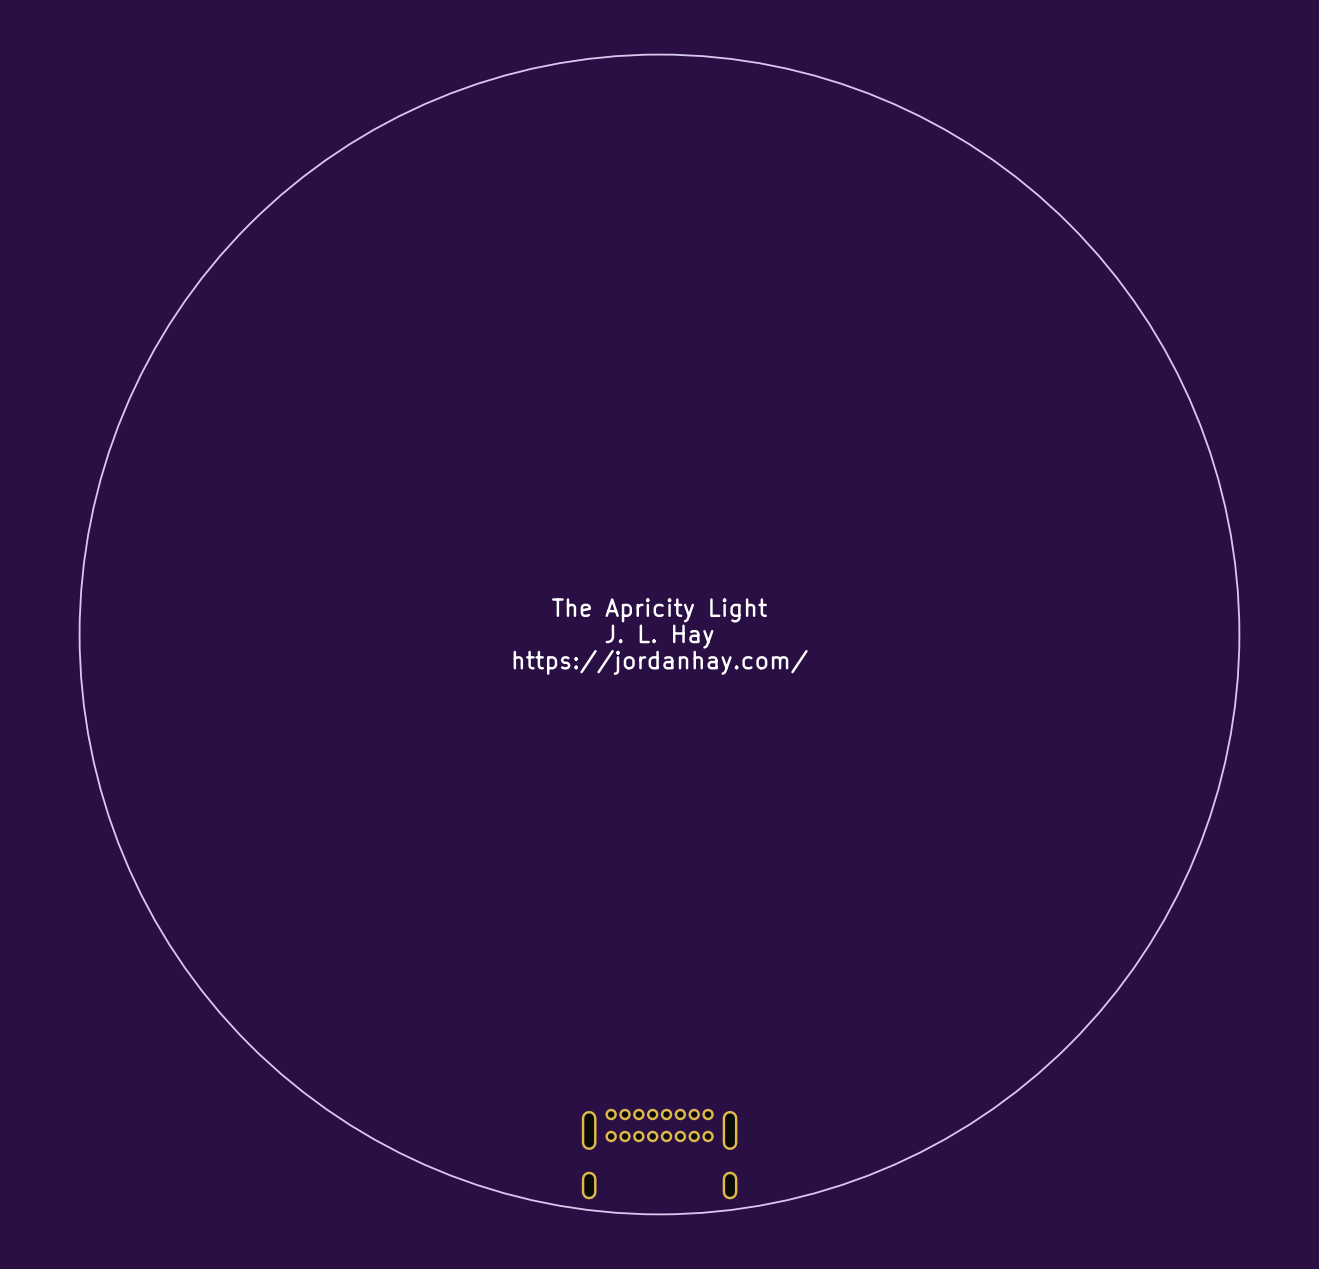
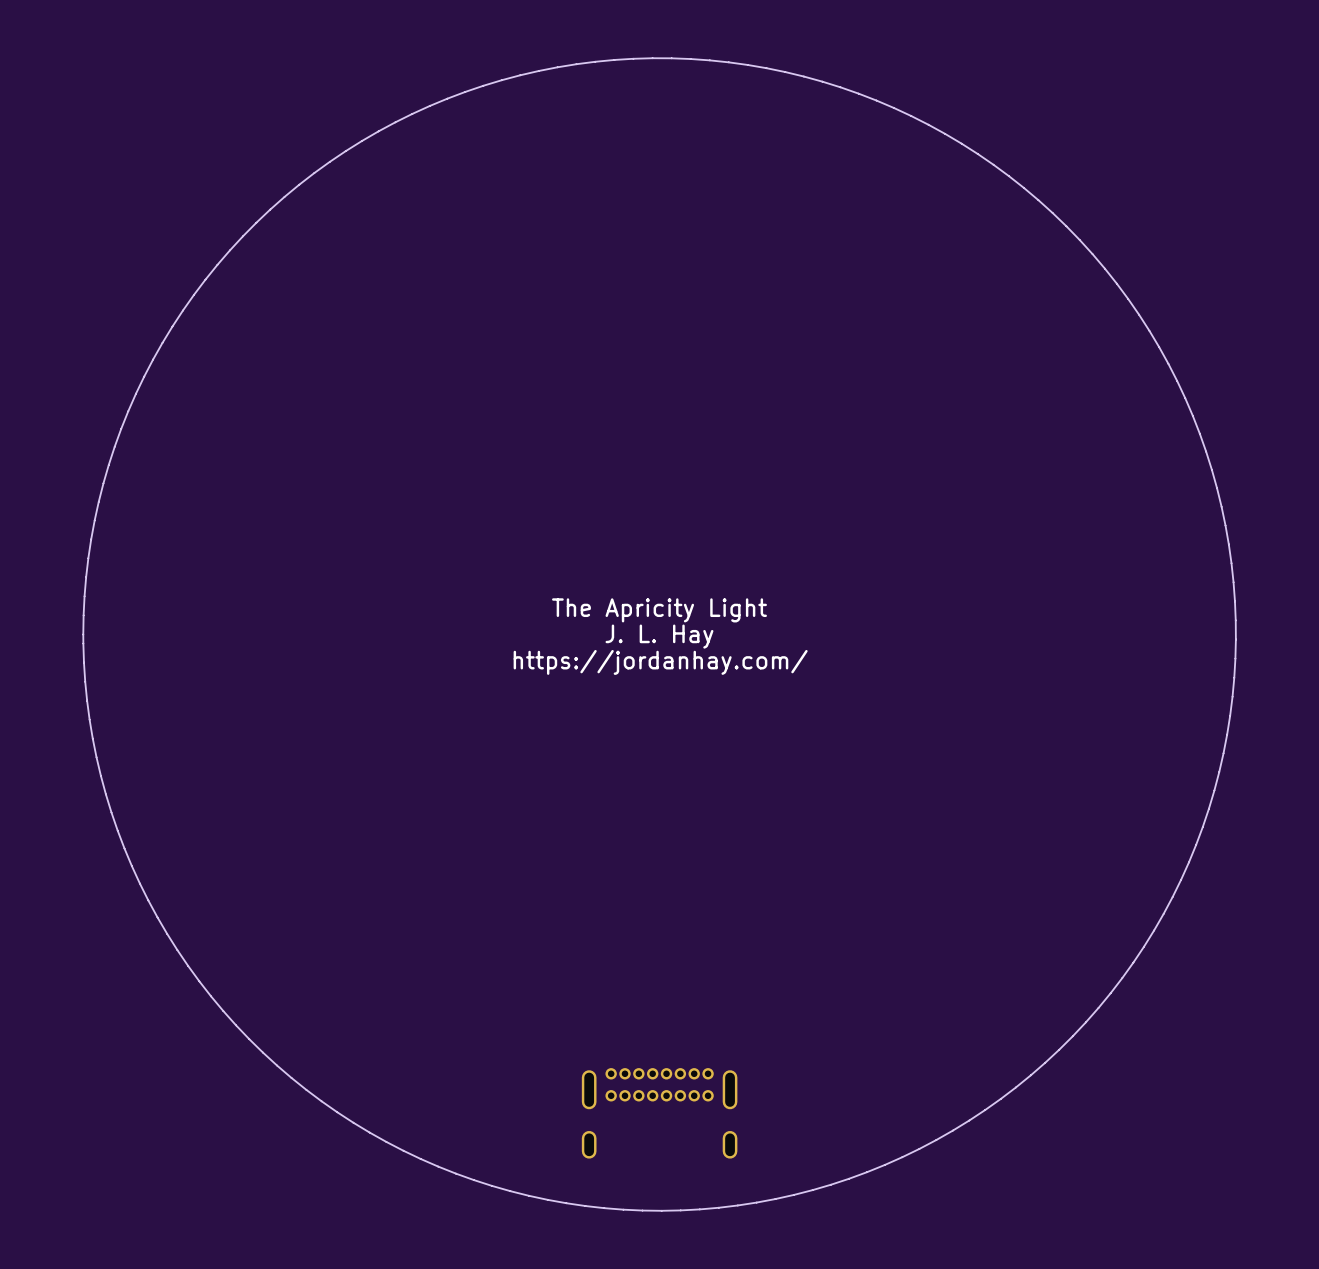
round board edge: [78, 53, 1241, 1216] -> none
board edge: none -> (652, 58) (709, 60) (766, 68) (822, 81) (876, 100) (928, 124) (977, 153) (1023, 187) (1066, 226) (1104, 268) (1139, 314) (1168, 363) (1192, 415) (1211, 469) (1225, 525) (1233, 582) (1235, 639) (1232, 696) (1223, 753) (1214, 790) (1196, 844) (1172, 897) (1144, 946) (1110, 993) (1072, 1036) (1030, 1075) (985, 1110) (936, 1140) (884, 1164) (830, 1184) (775, 1199) (718, 1207) (661, 1210) (604, 1208) (547, 1199) (492, 1185) (438, 1166) (386, 1141) (337, 1112) (291, 1077) (249, 1039) (211, 996) (177, 950) (148, 900) (124, 848) (105, 794) (92, 738) (85, 681) (83, 634) (86, 577) (91, 539) (103, 483) (121, 428) (144, 376) (172, 326) (205, 279) (242, 236) (284, 196) (329, 161) (378, 131) (429, 105) (483, 85) (538, 70) (595, 61) (652, 58)
part position: (659, 1154) -> (659, 1113)

